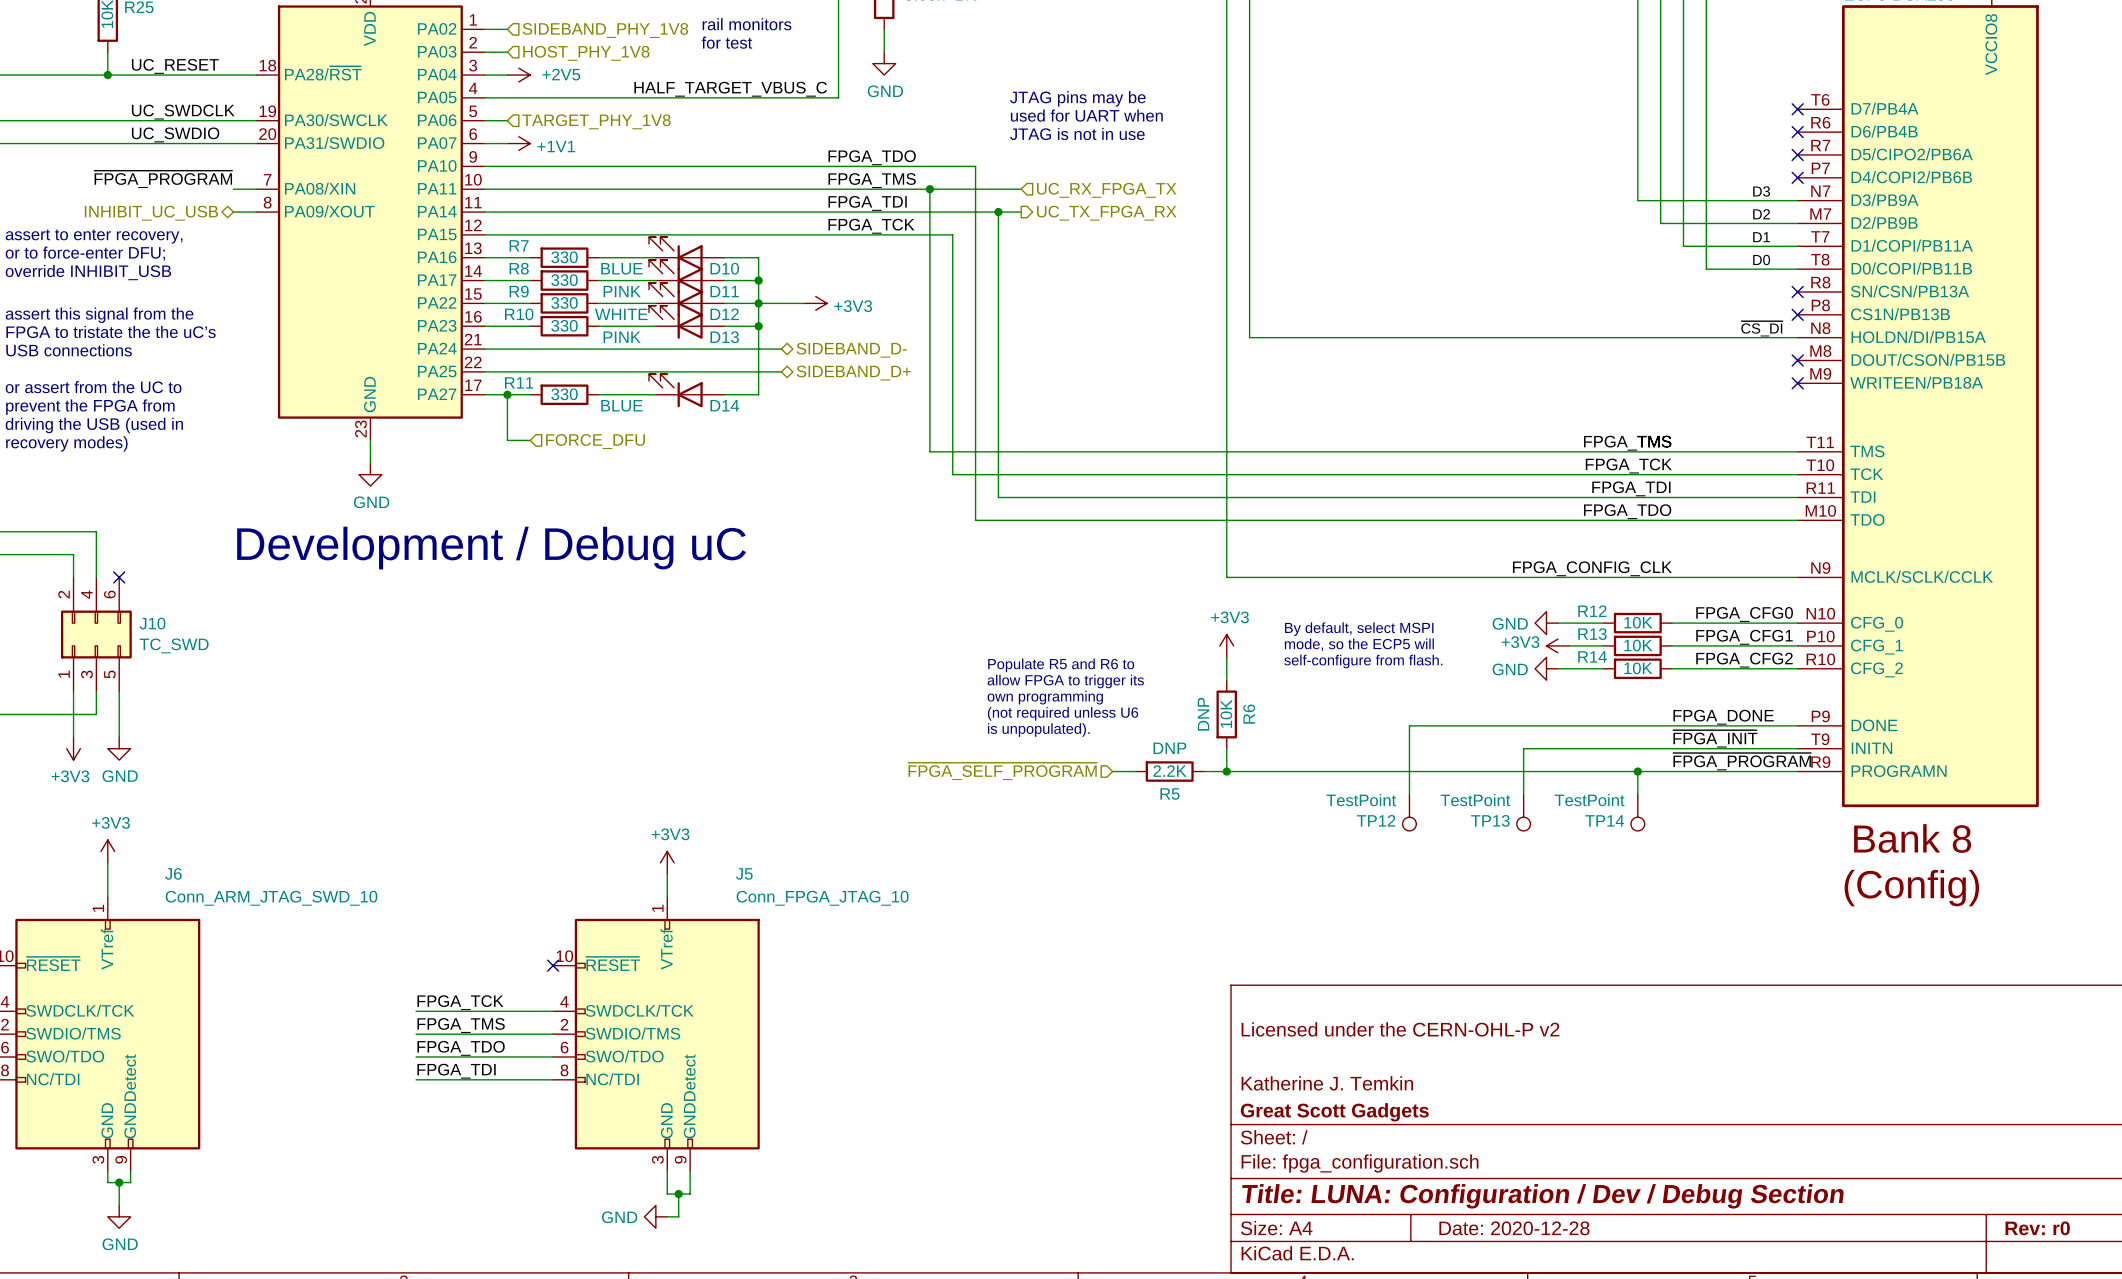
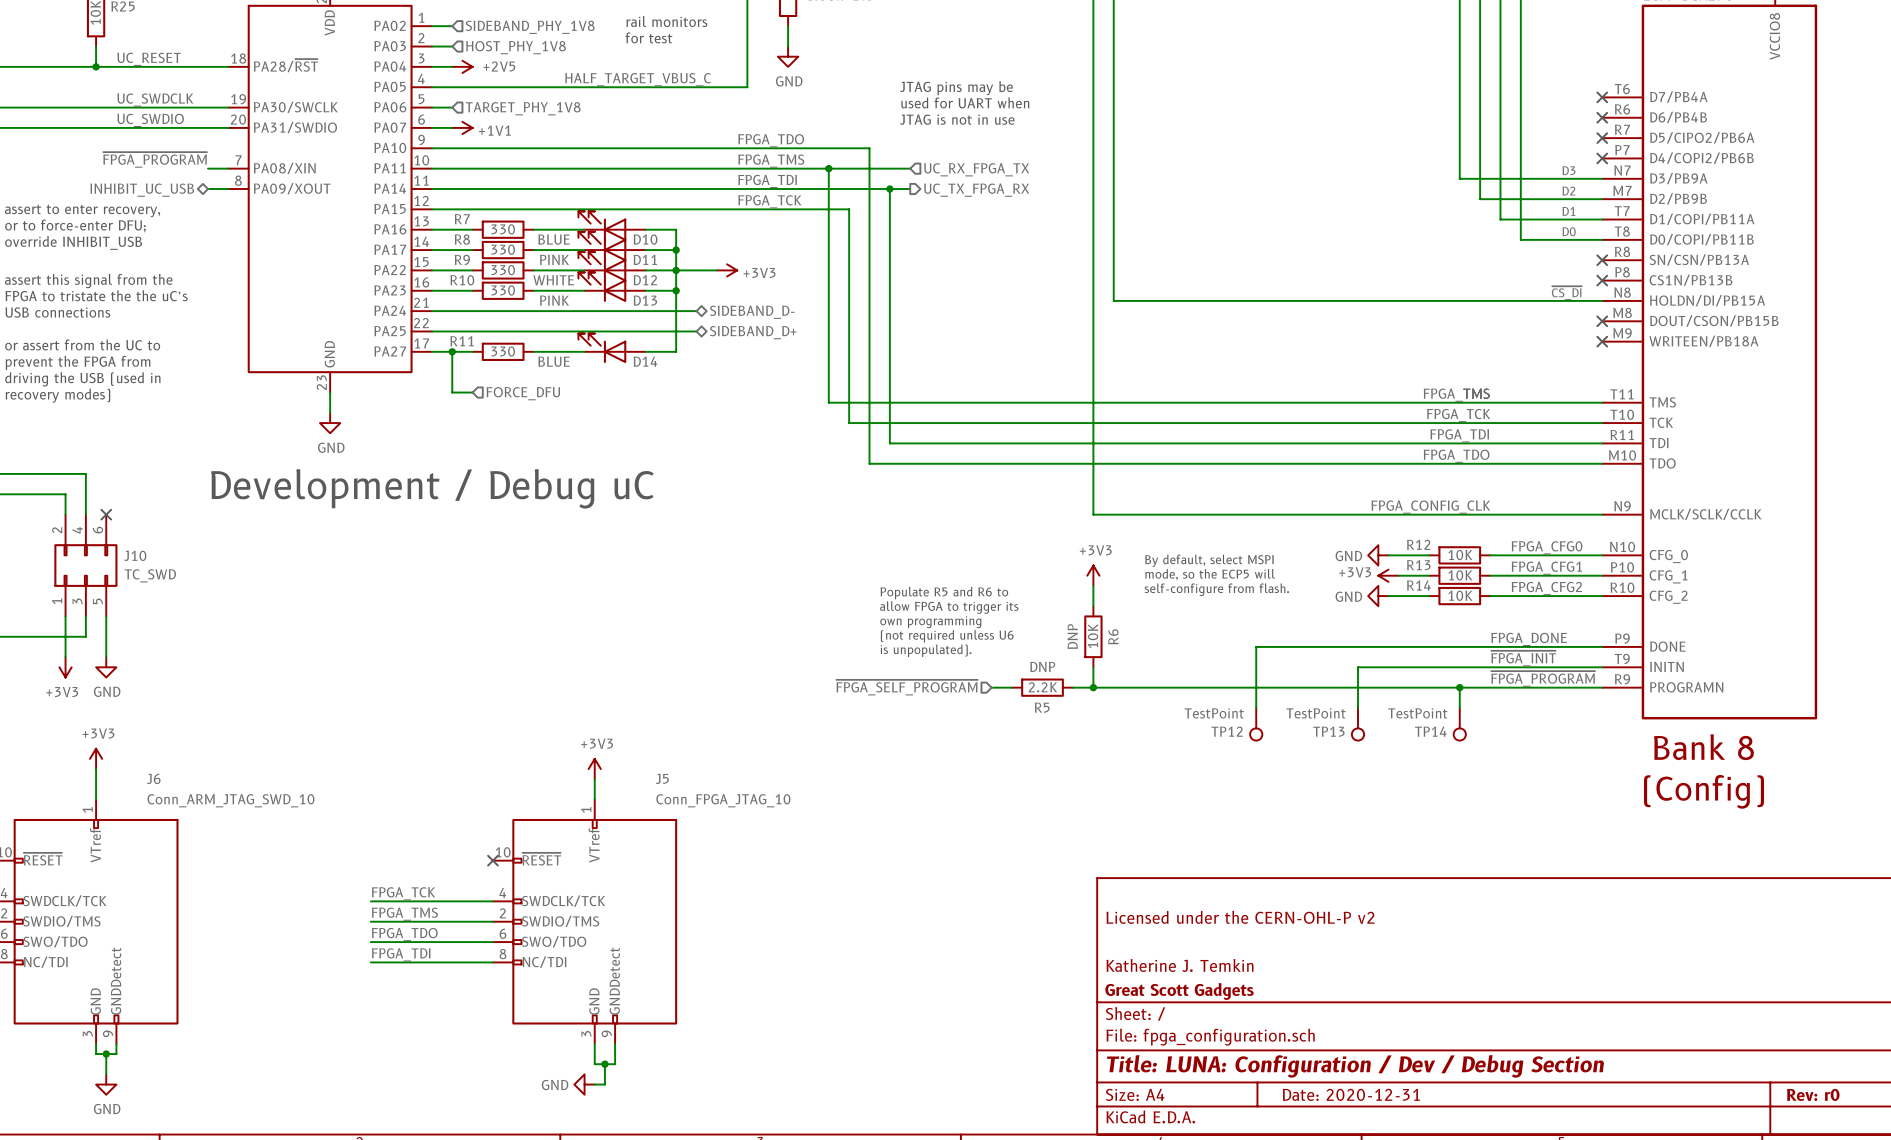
title block: Date: 2020-12-28 (1514, 1228) -> Date: 2020-12-31 (1351, 1094)

